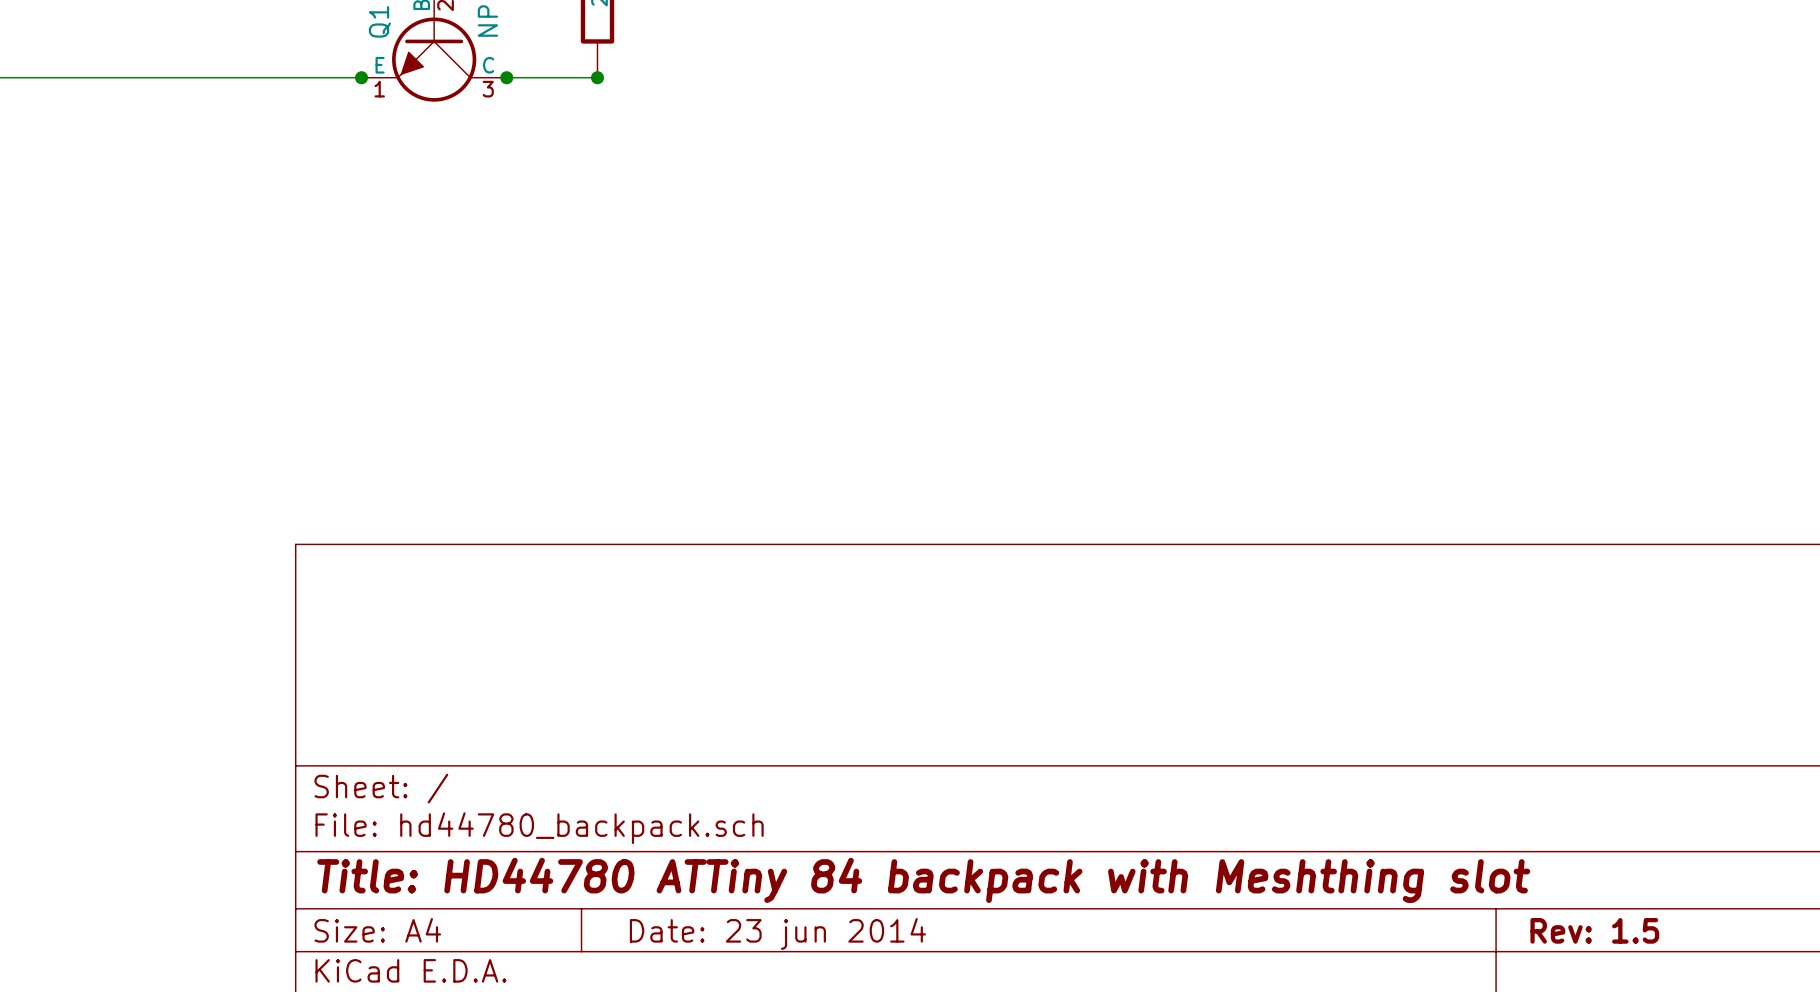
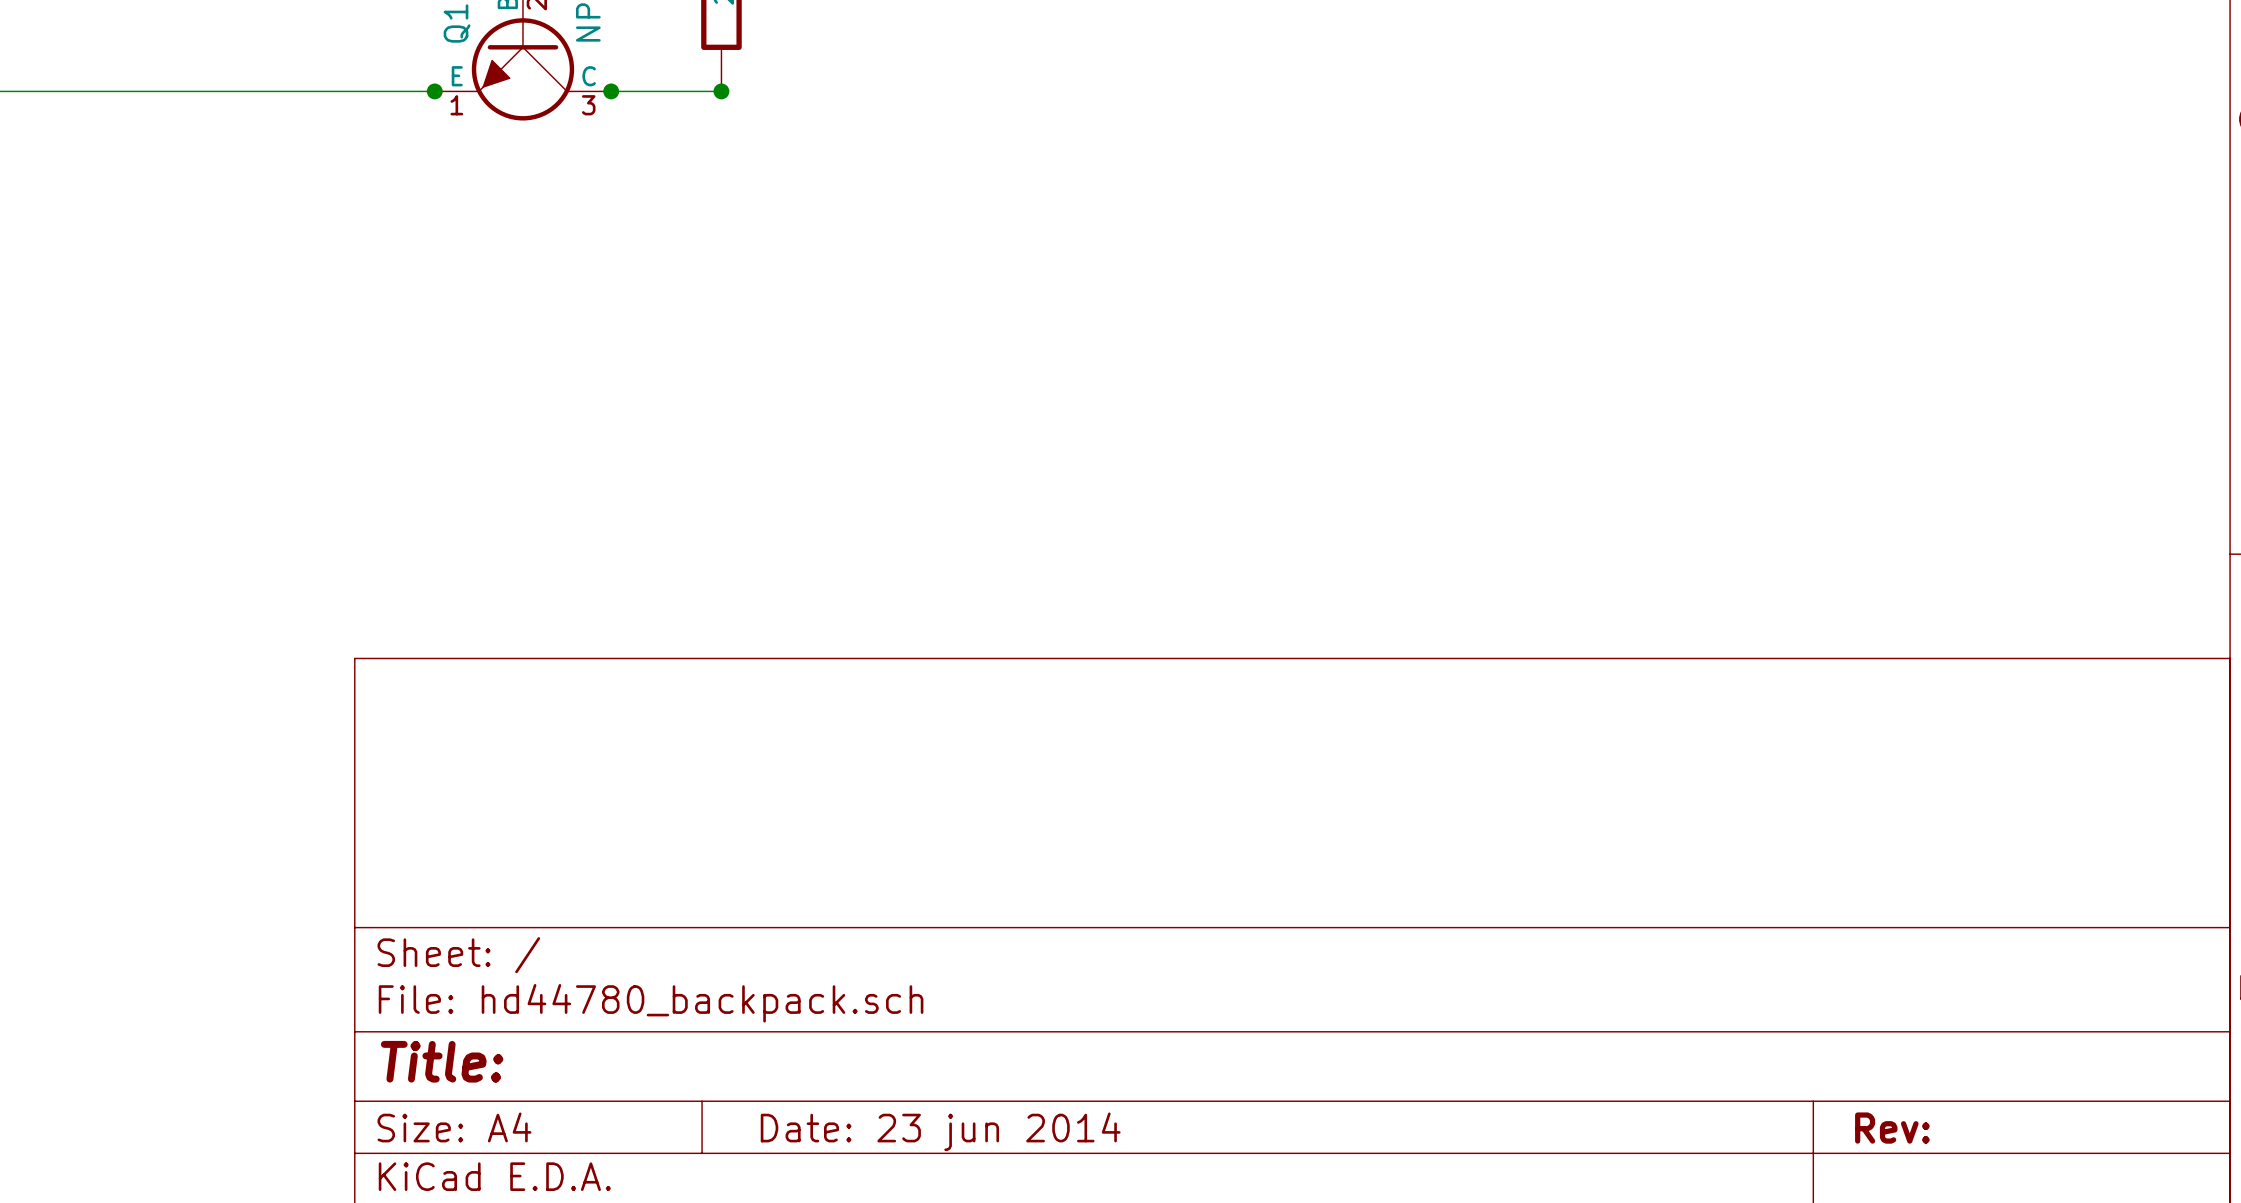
title block: Title: HD44780 ATTiny 84 backpack with Meshthing slot (923, 880) -> Title: (442, 1061)
title block: Rev: 1.5 (1594, 930) -> Rev: (1892, 1128)

